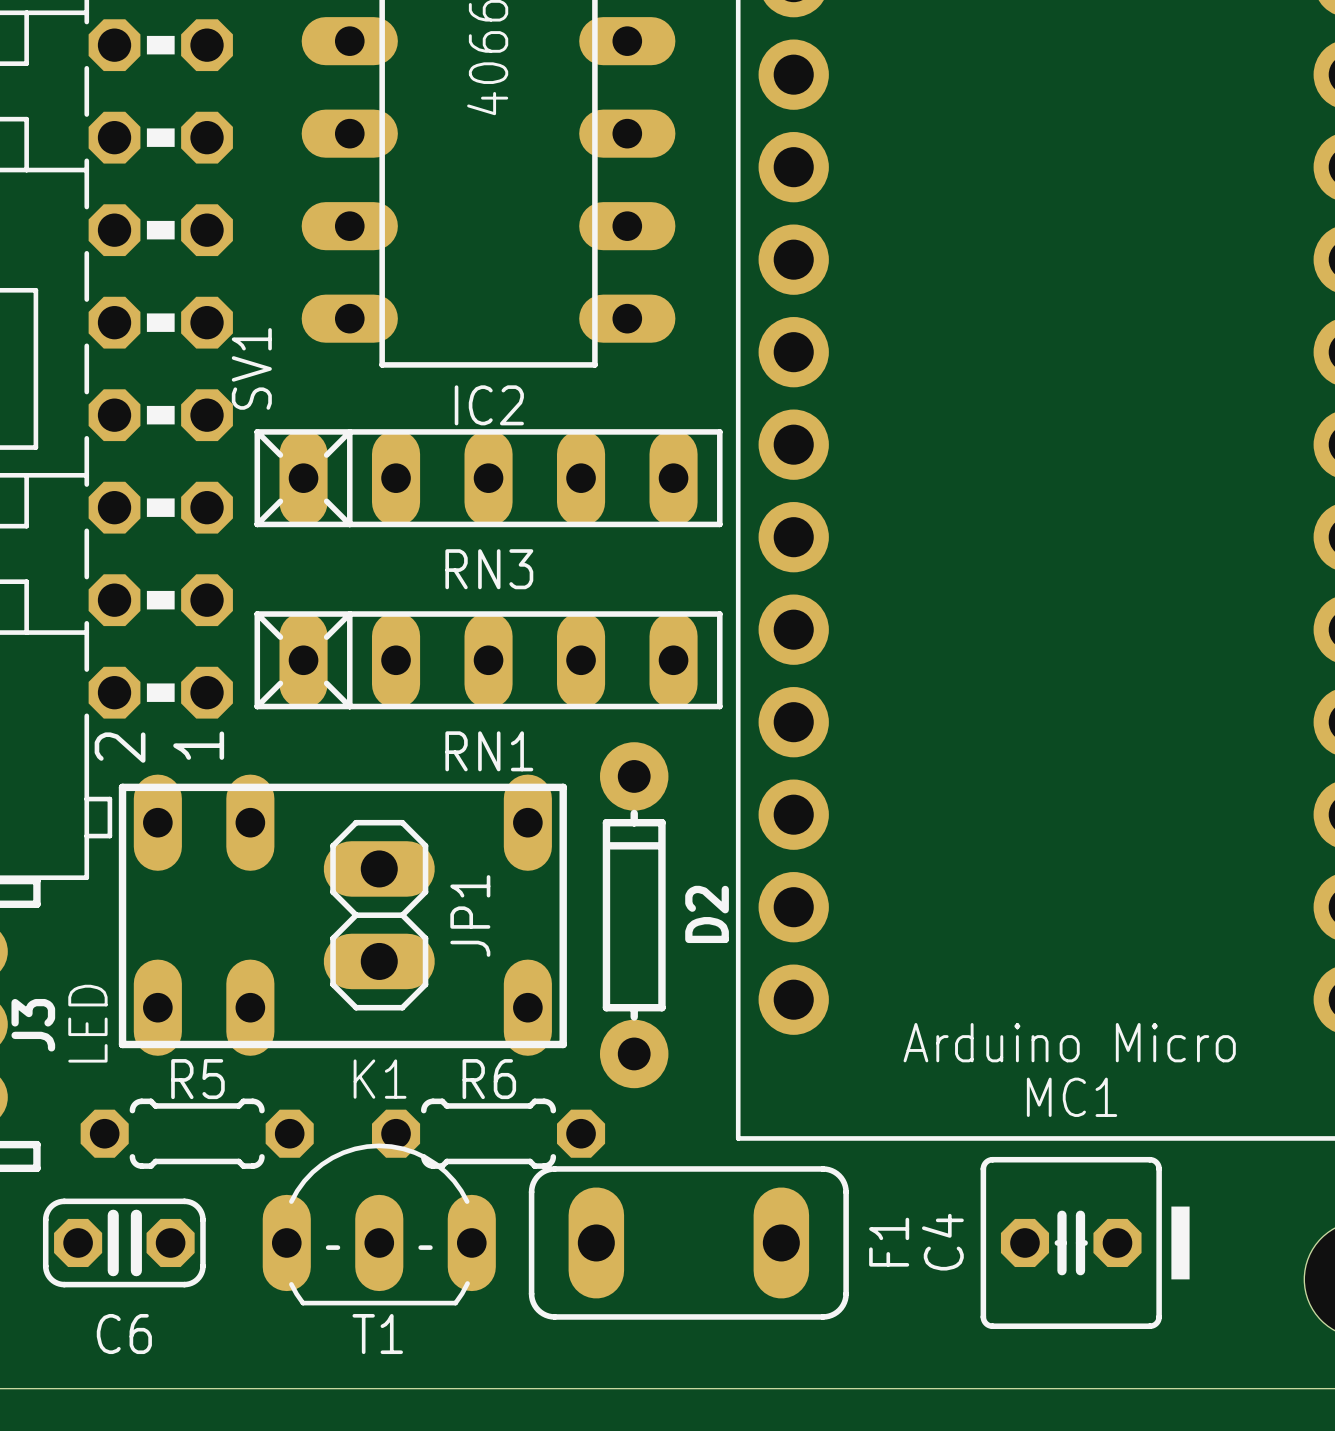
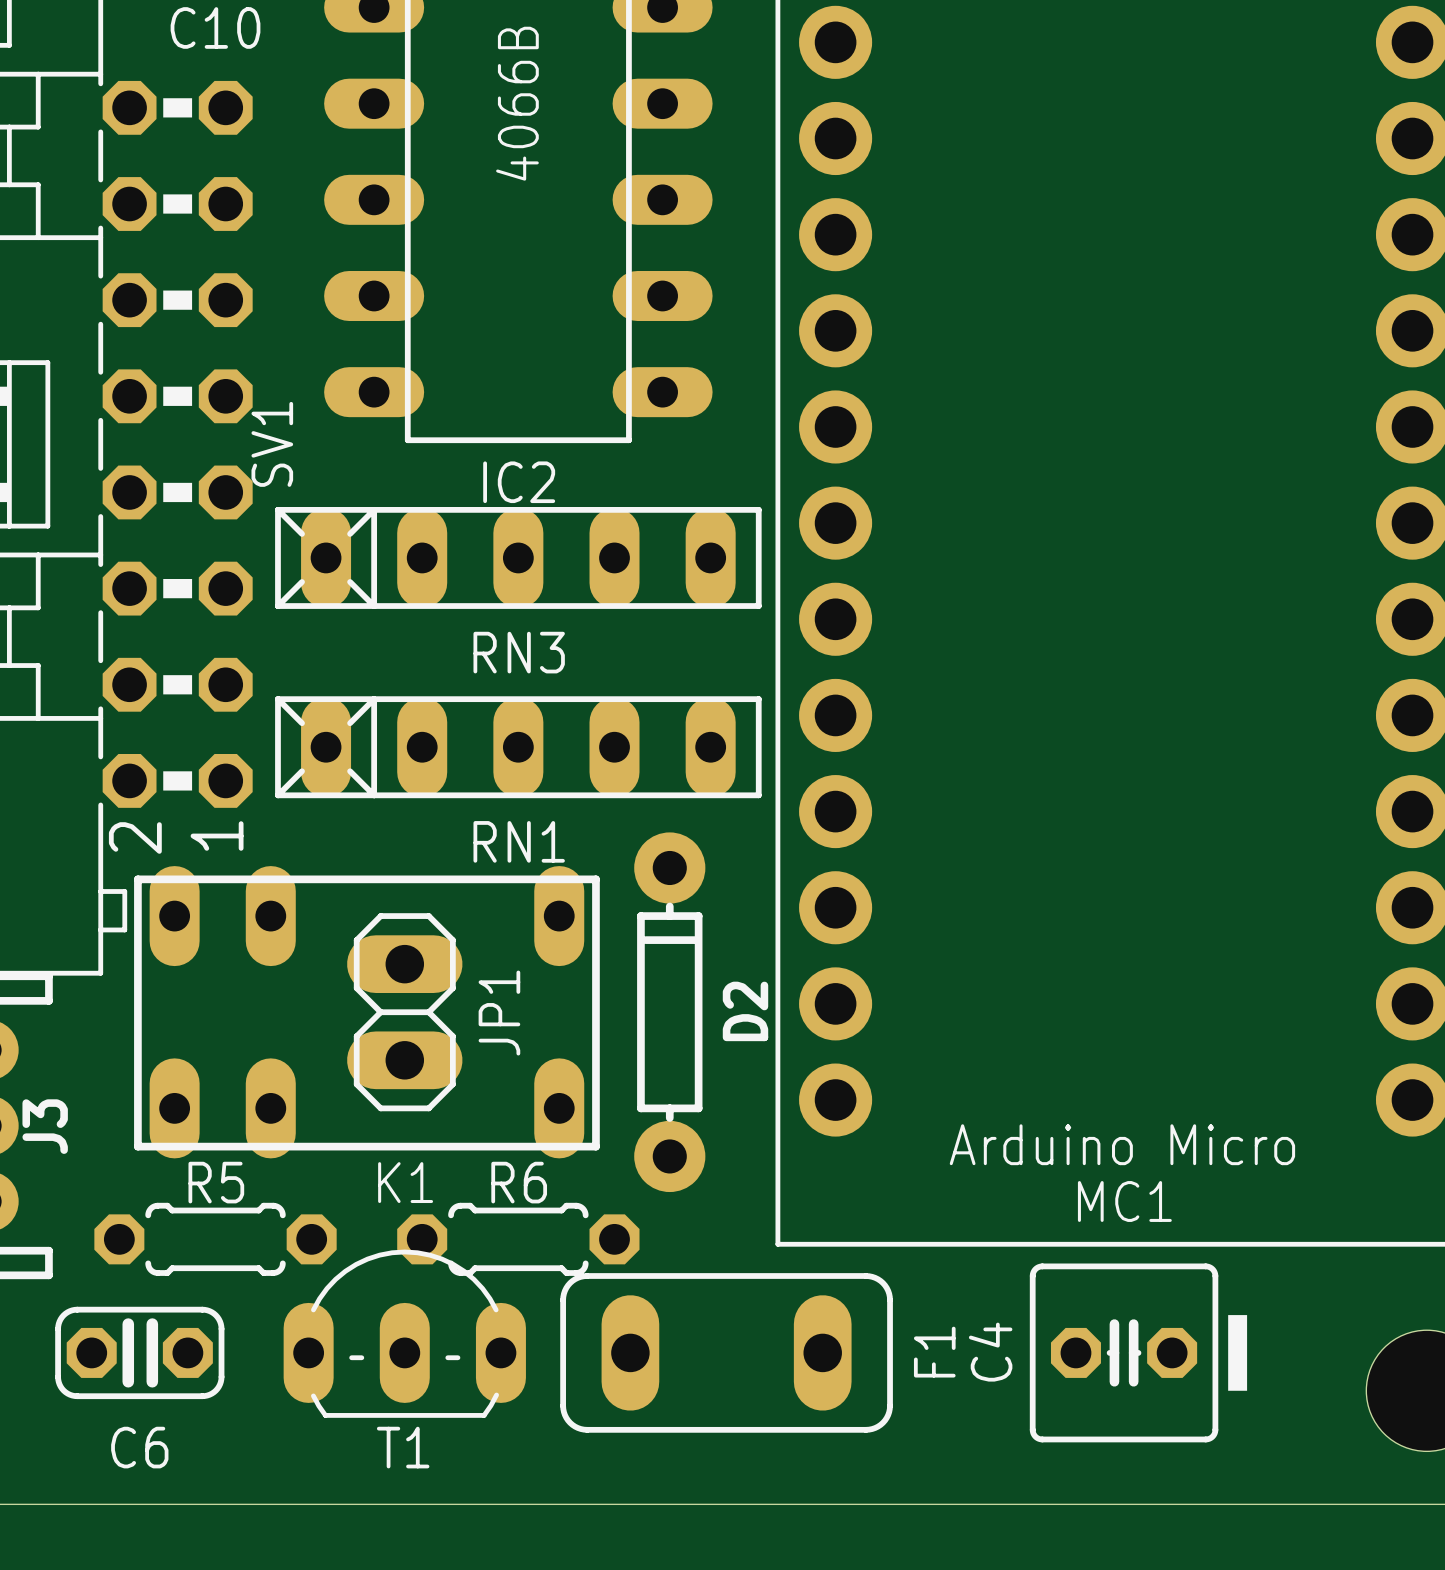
text: LED (87, 1023) -> none

